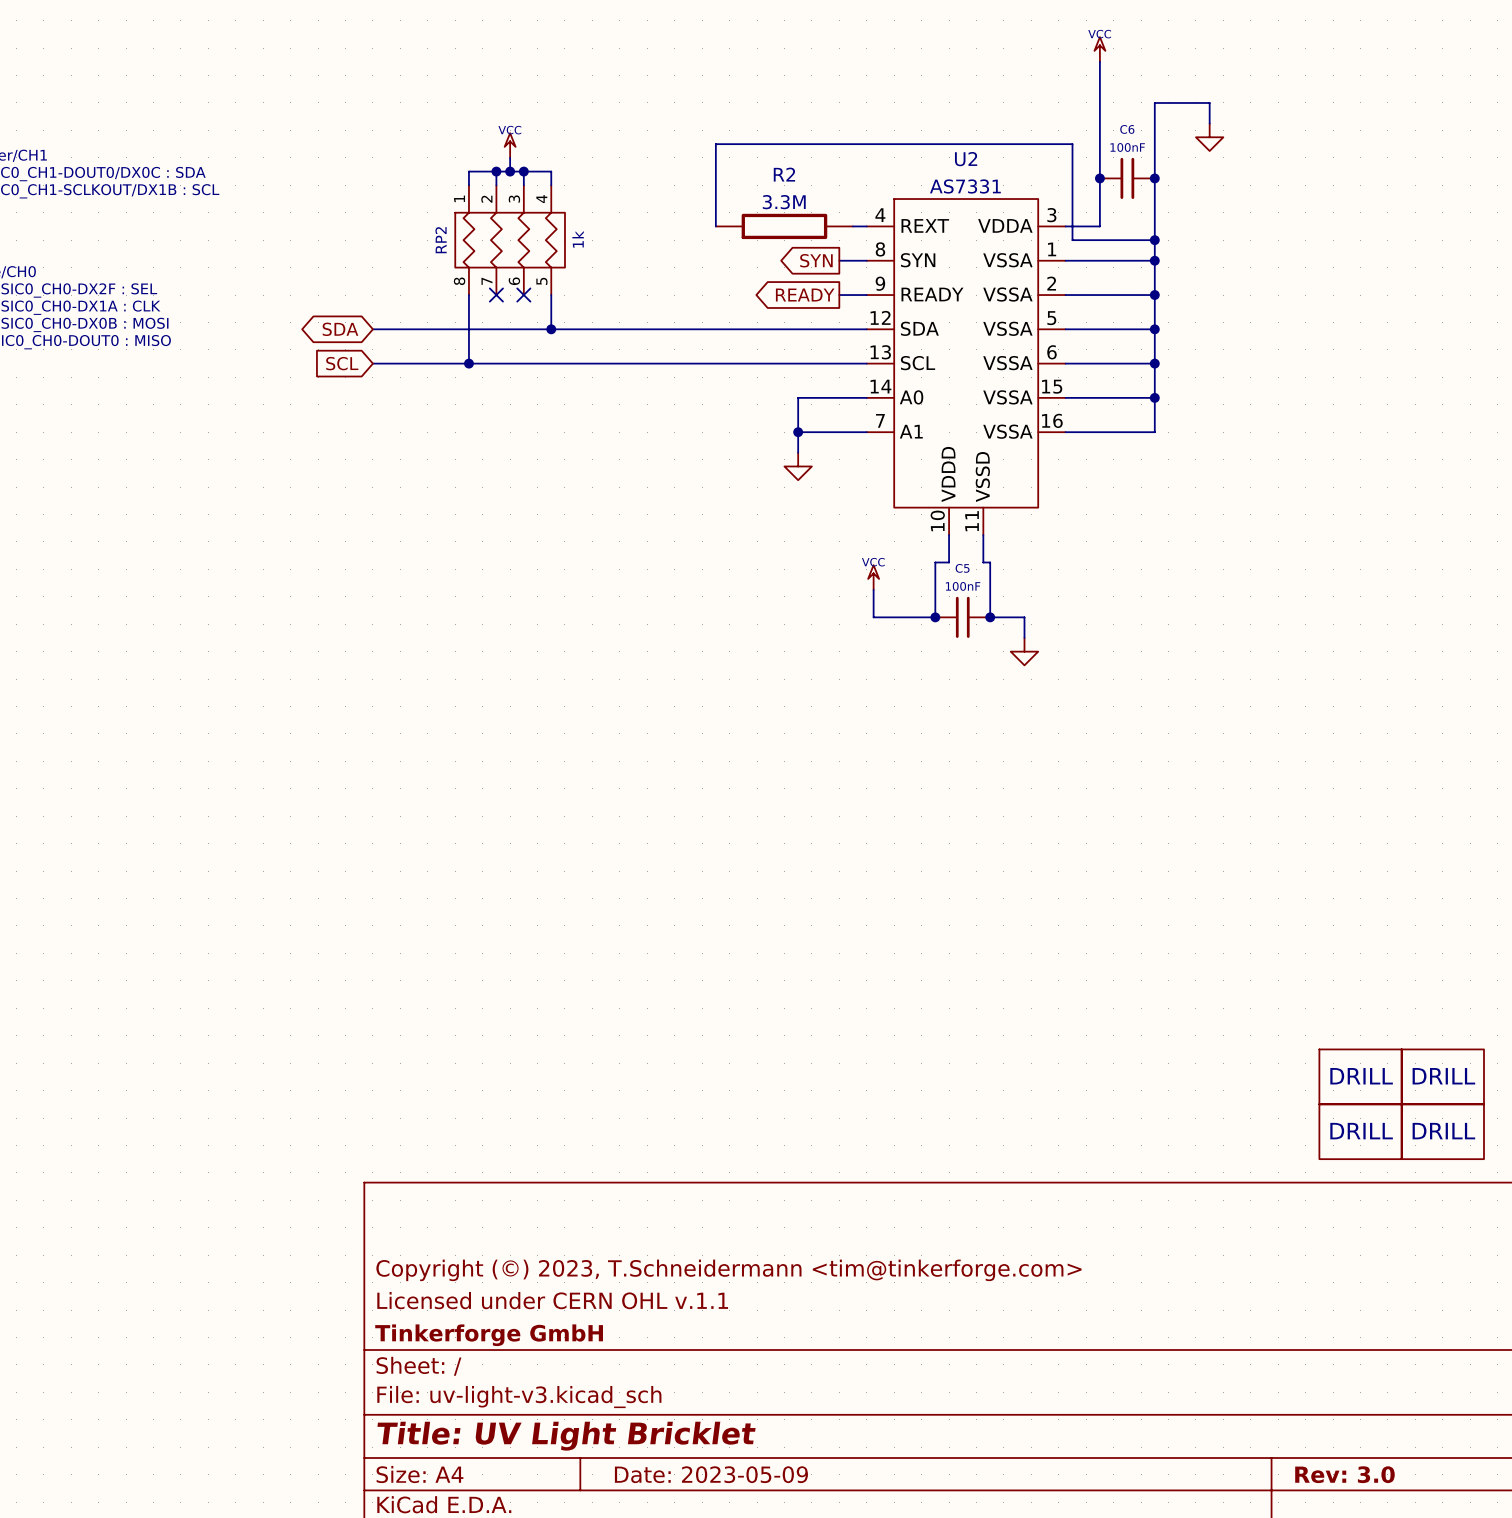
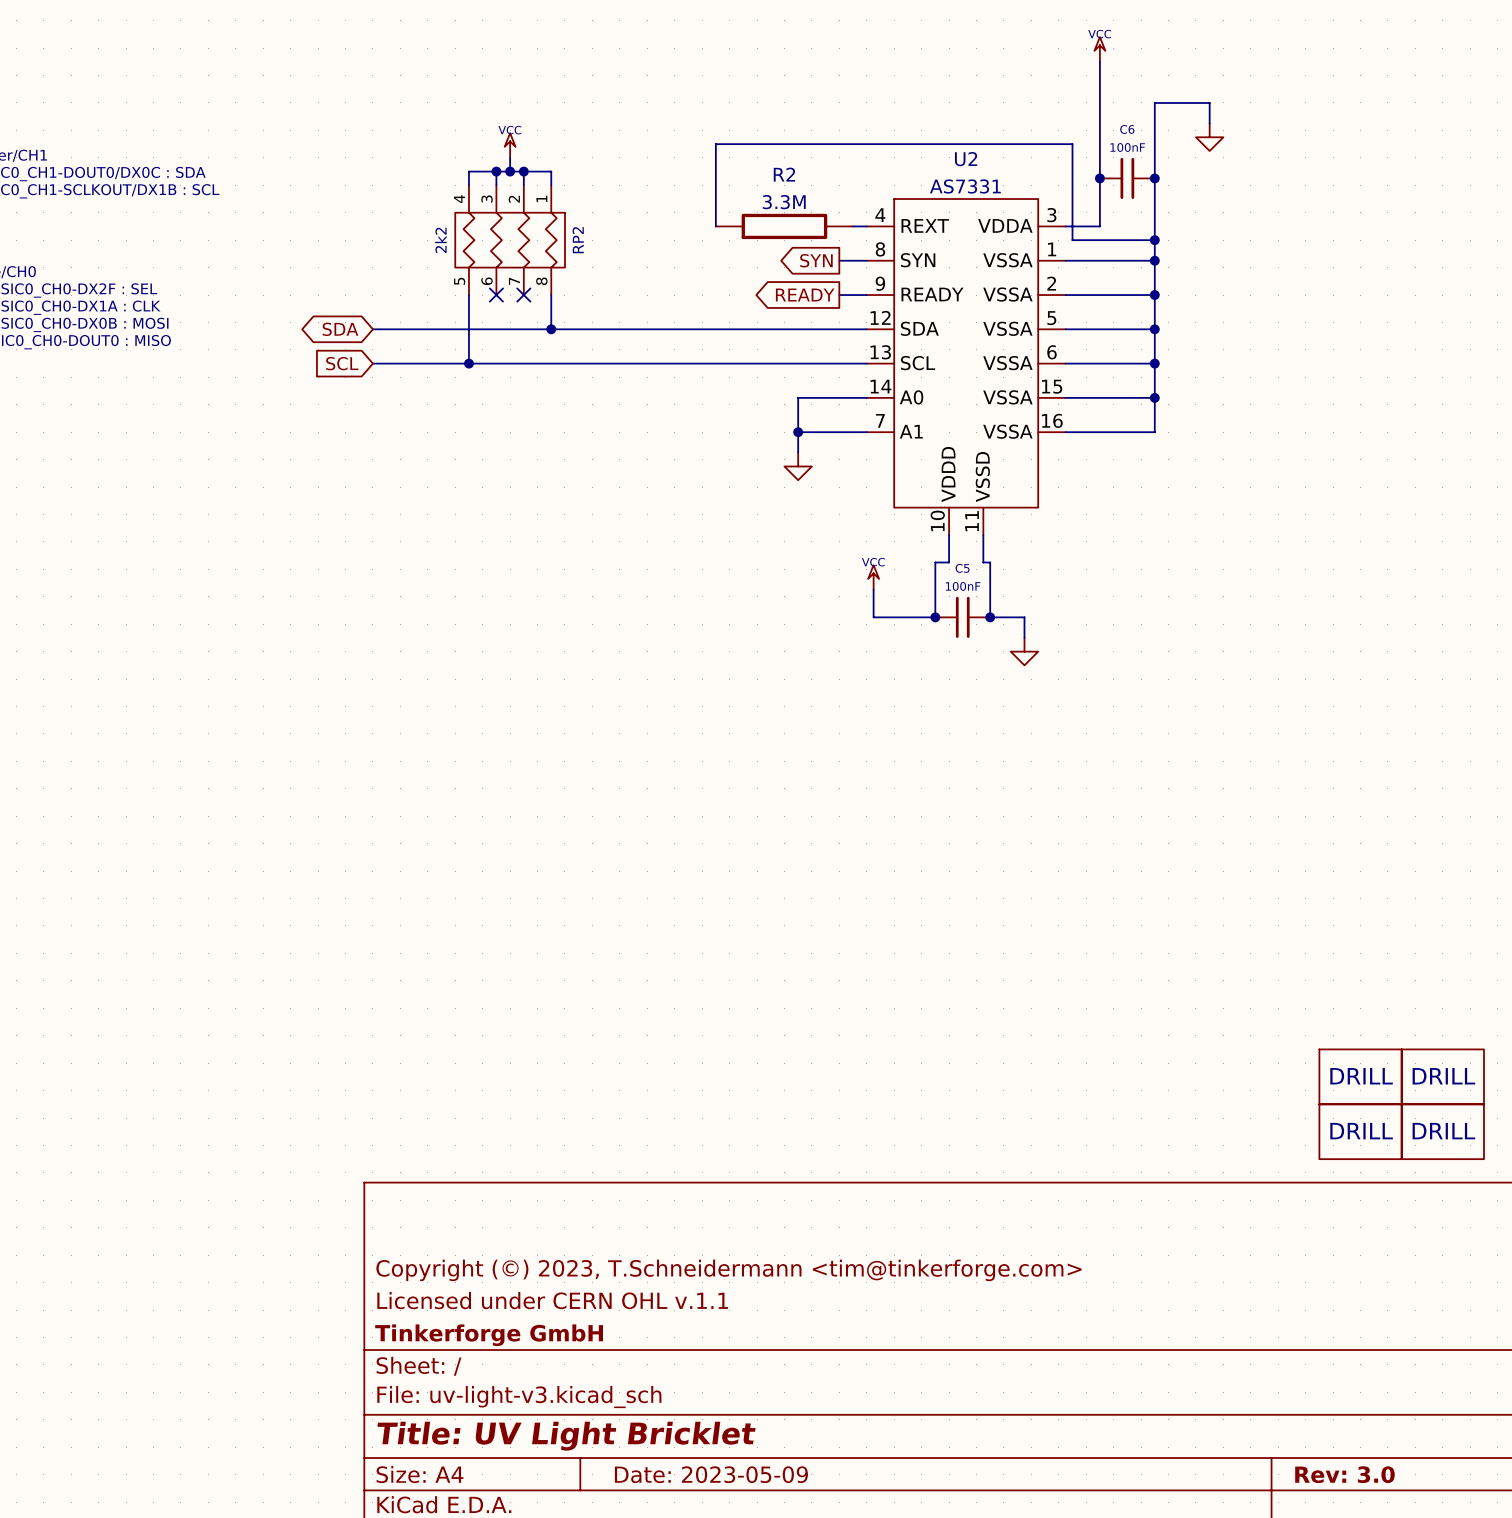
RP2 value: 1k (578, 239) -> 2k2 (440, 240)
RP2 flip: as is (510, 240) -> left-right (510, 240)

